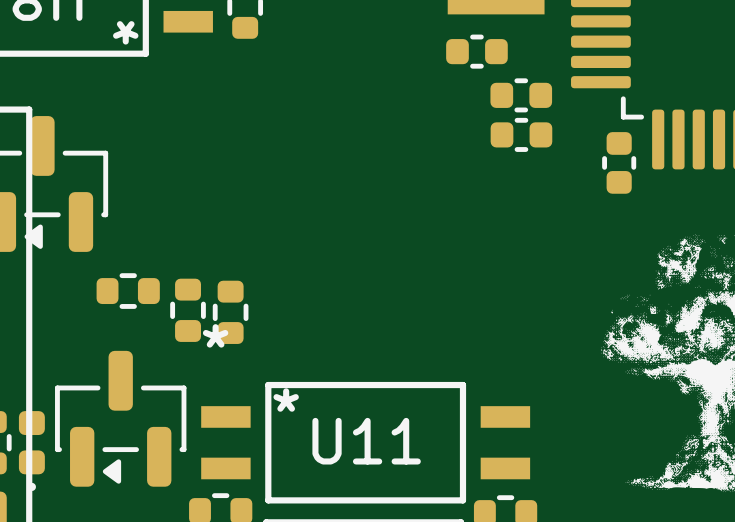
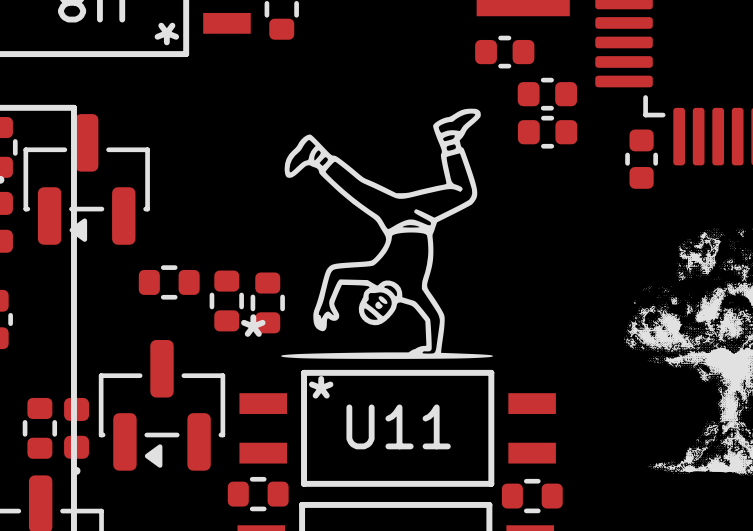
drawing: none -> [281, 108, 493, 359]

